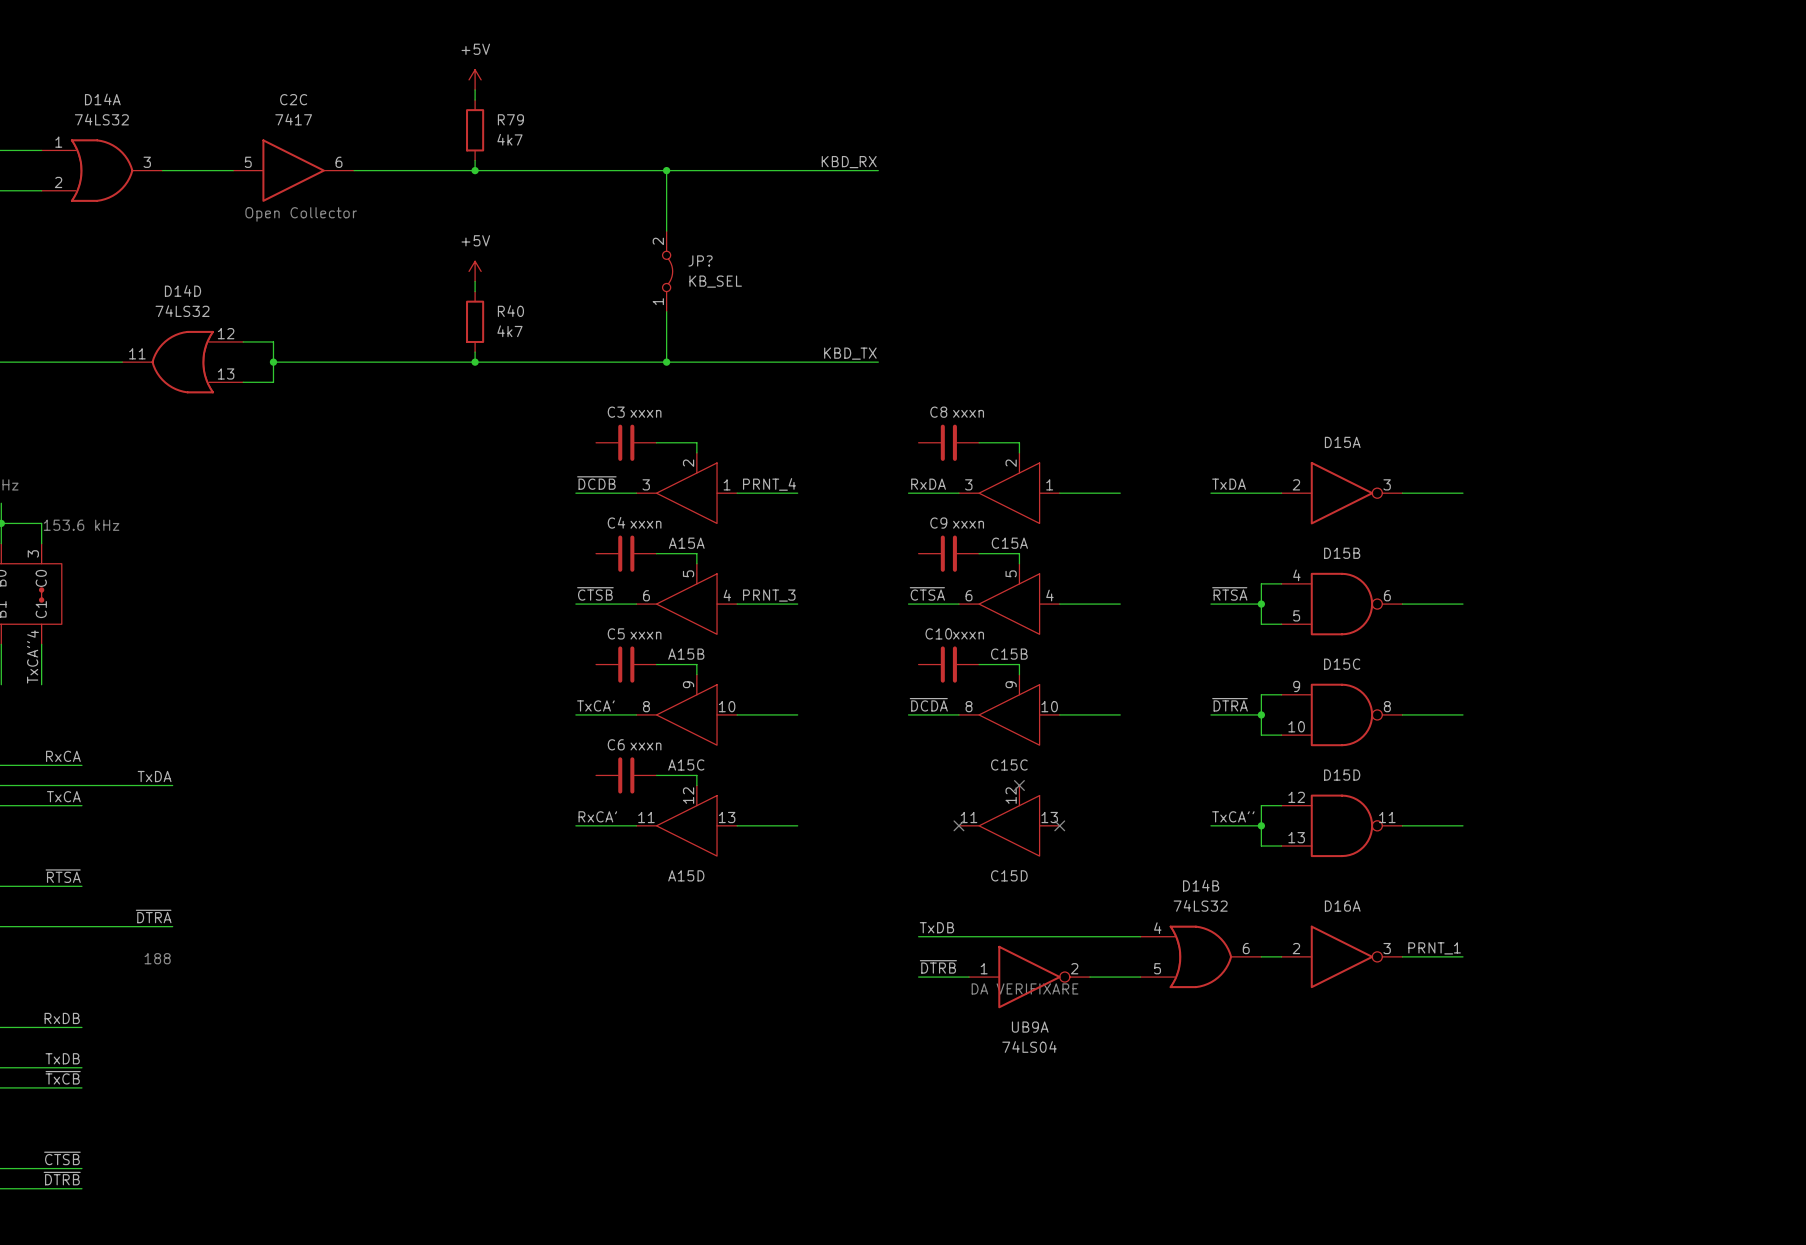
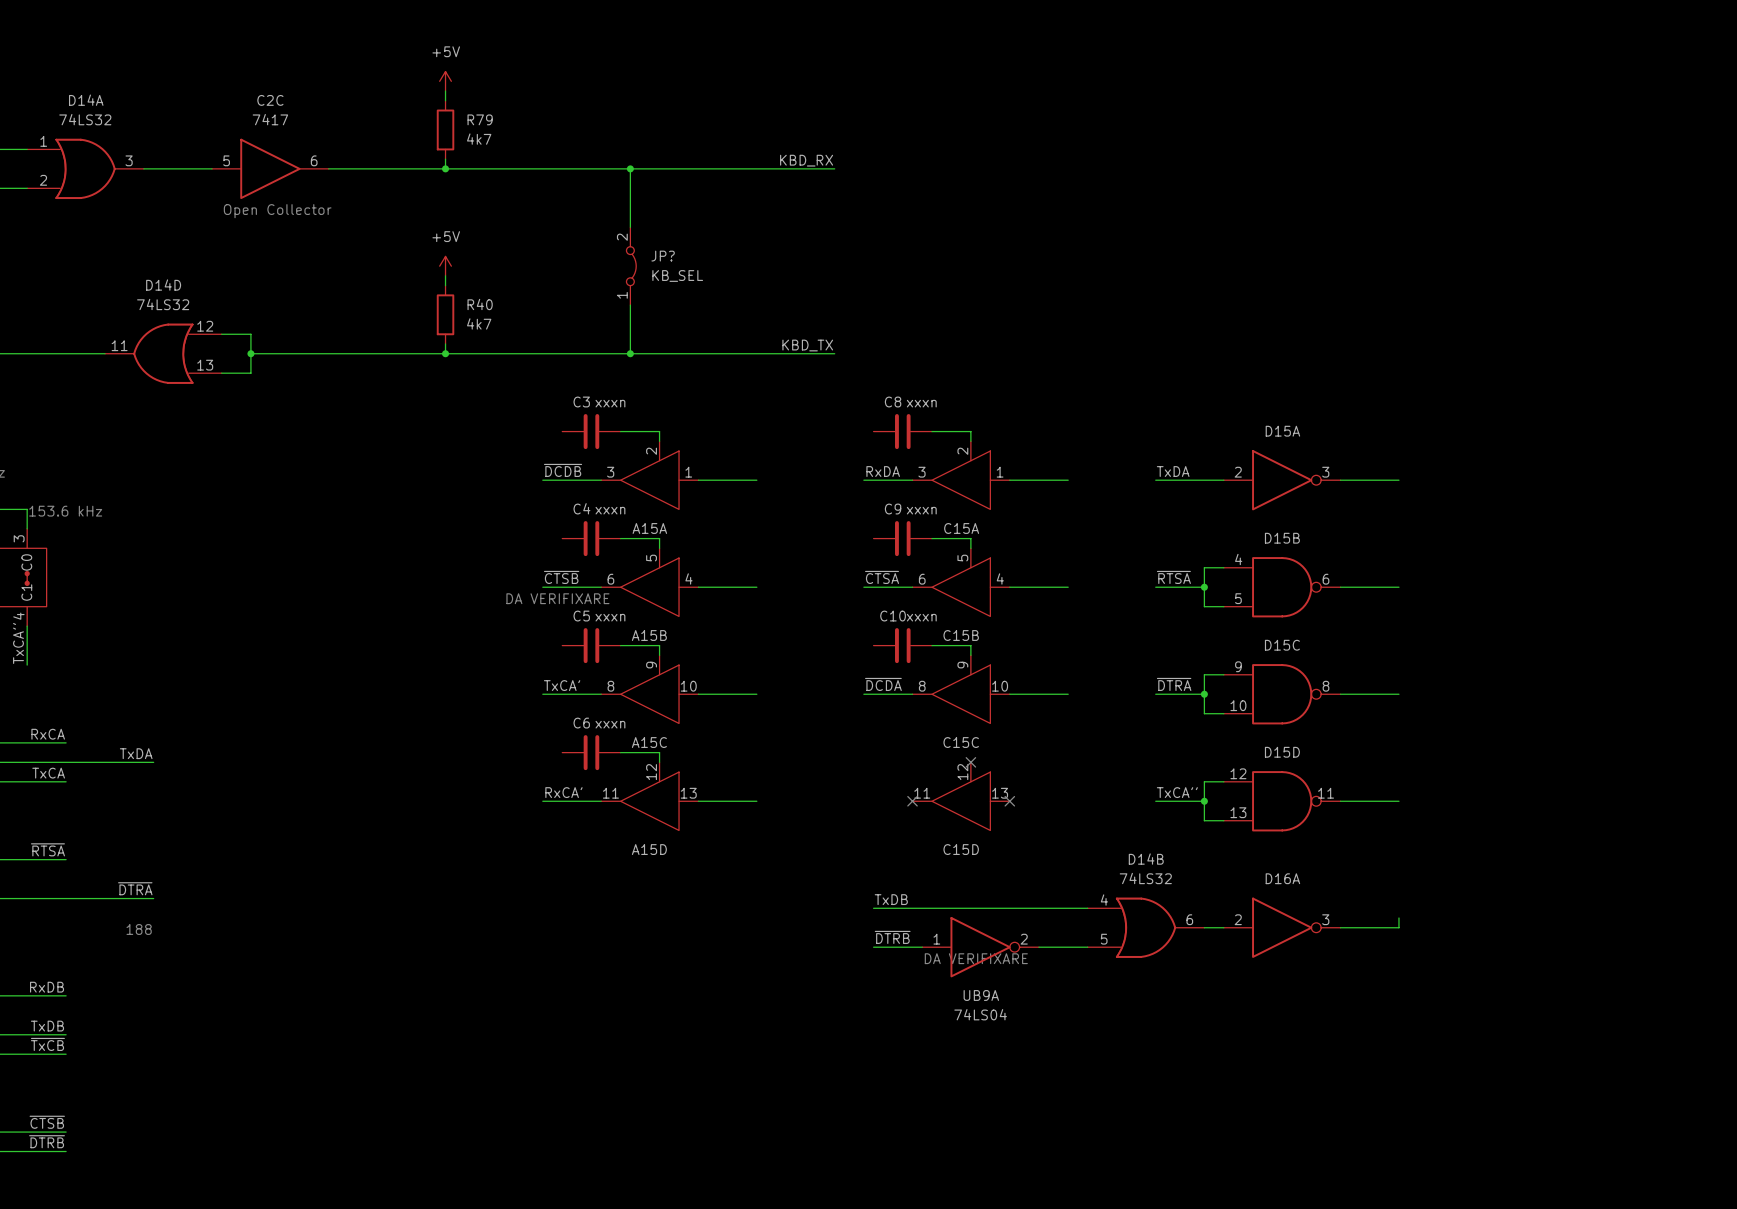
label: PRNT_4 (769, 484) -> none
label: PRNT_3 (769, 595) -> none
text: none -> DA VERIFIXARE (557, 598)
wire: none -> (1398, 918) (1398, 927)
label: PRNT_1 (1434, 948) -> none

